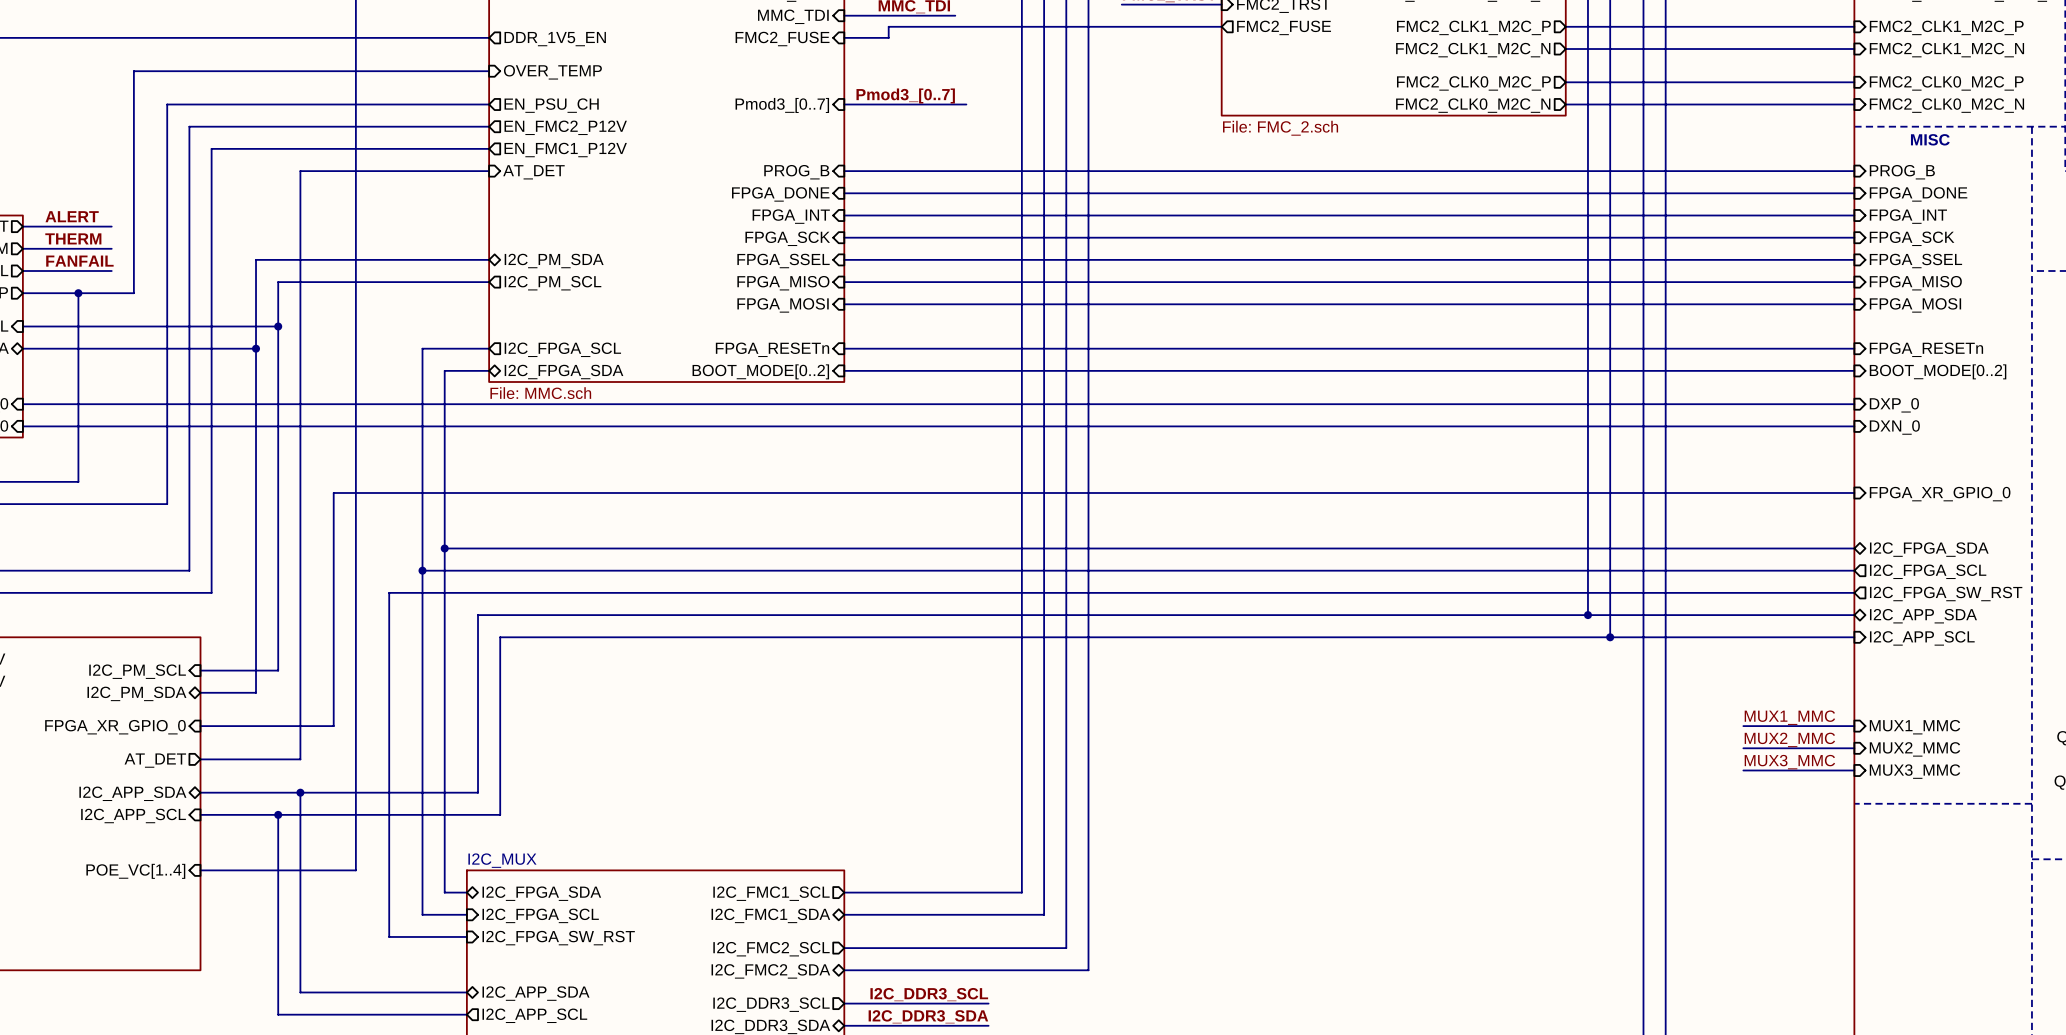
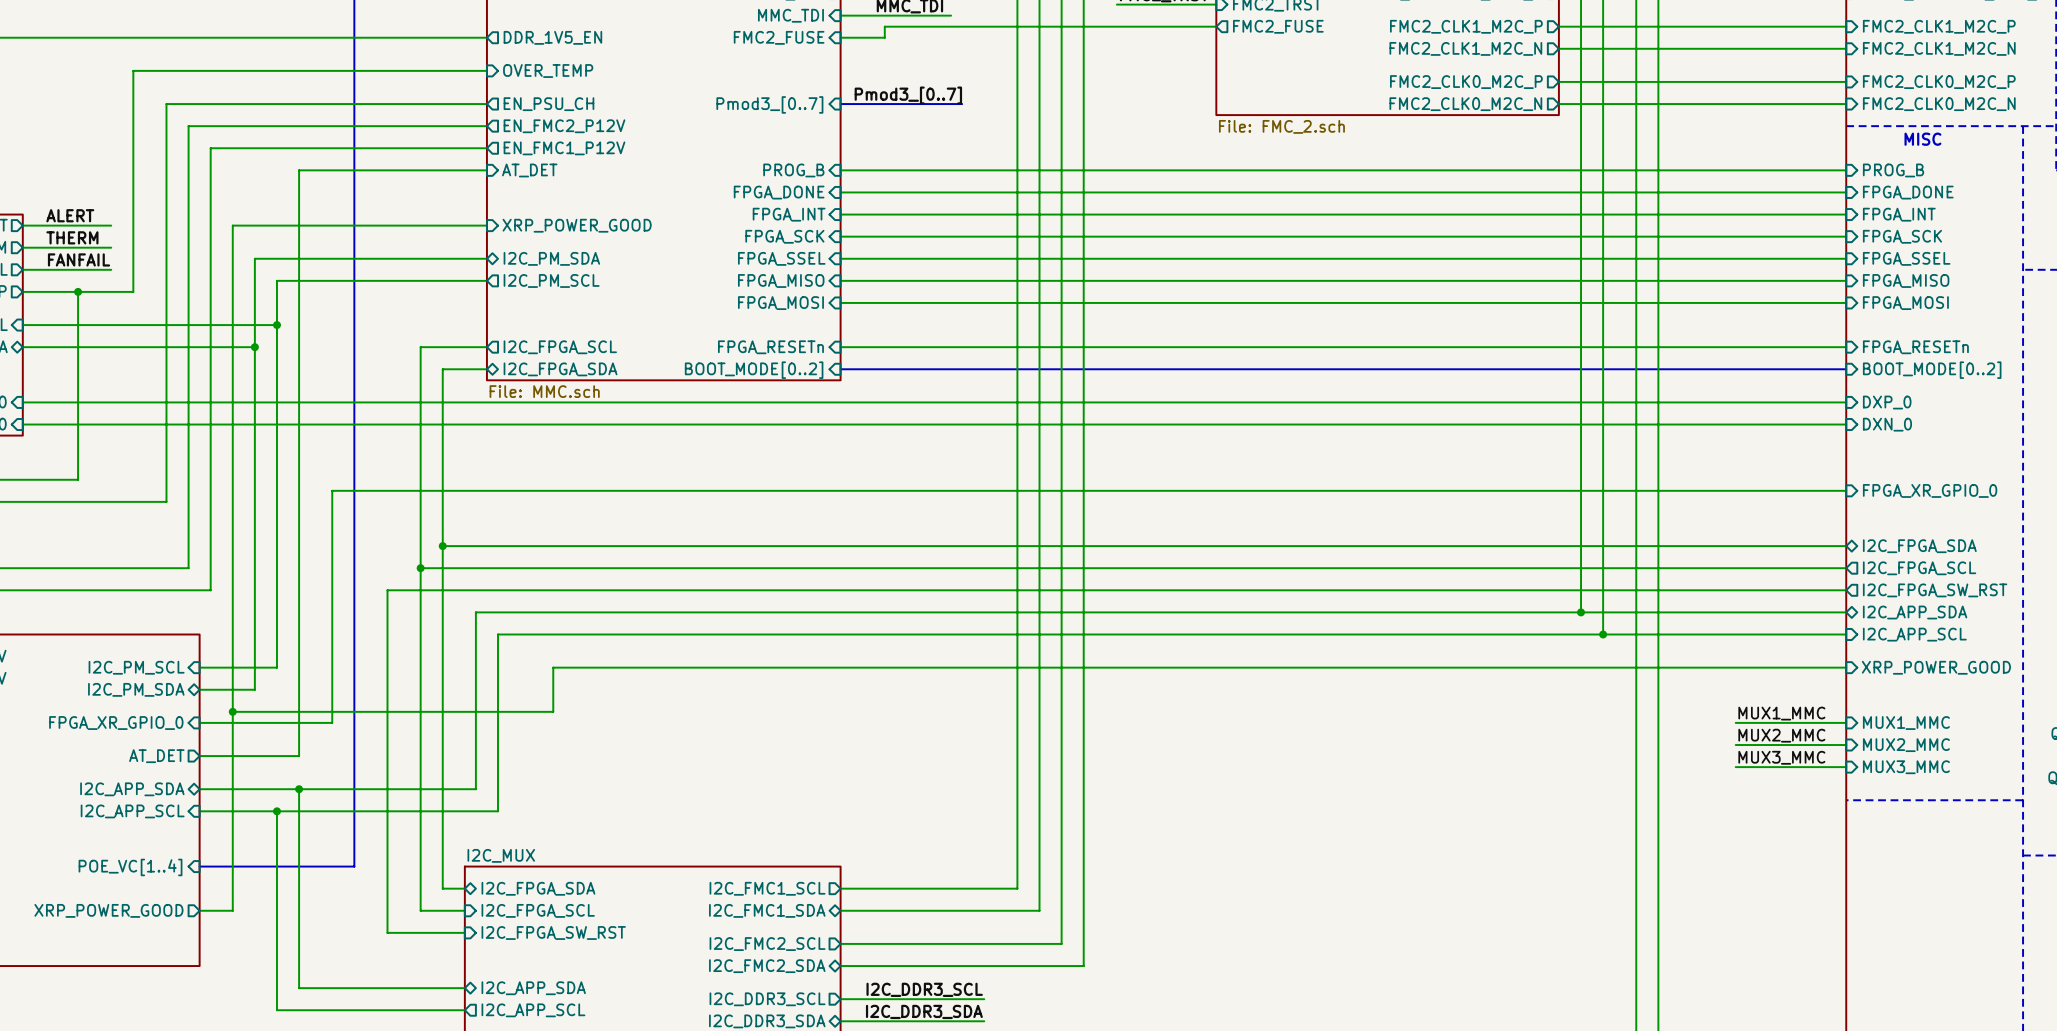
wire: none -> (486, 225) (232, 225) (232, 910) (199, 910)
sheet pin: none -> XRP_POWER_GOOD (577, 225)
wire: none -> (1846, 667) (553, 667) (553, 711) (232, 711)
sheet pin: none -> XRP_POWER_GOOD (1936, 667)
junction: none -> (232, 711)
sheet pin: none -> XRP_POWER_GOOD (108, 910)

